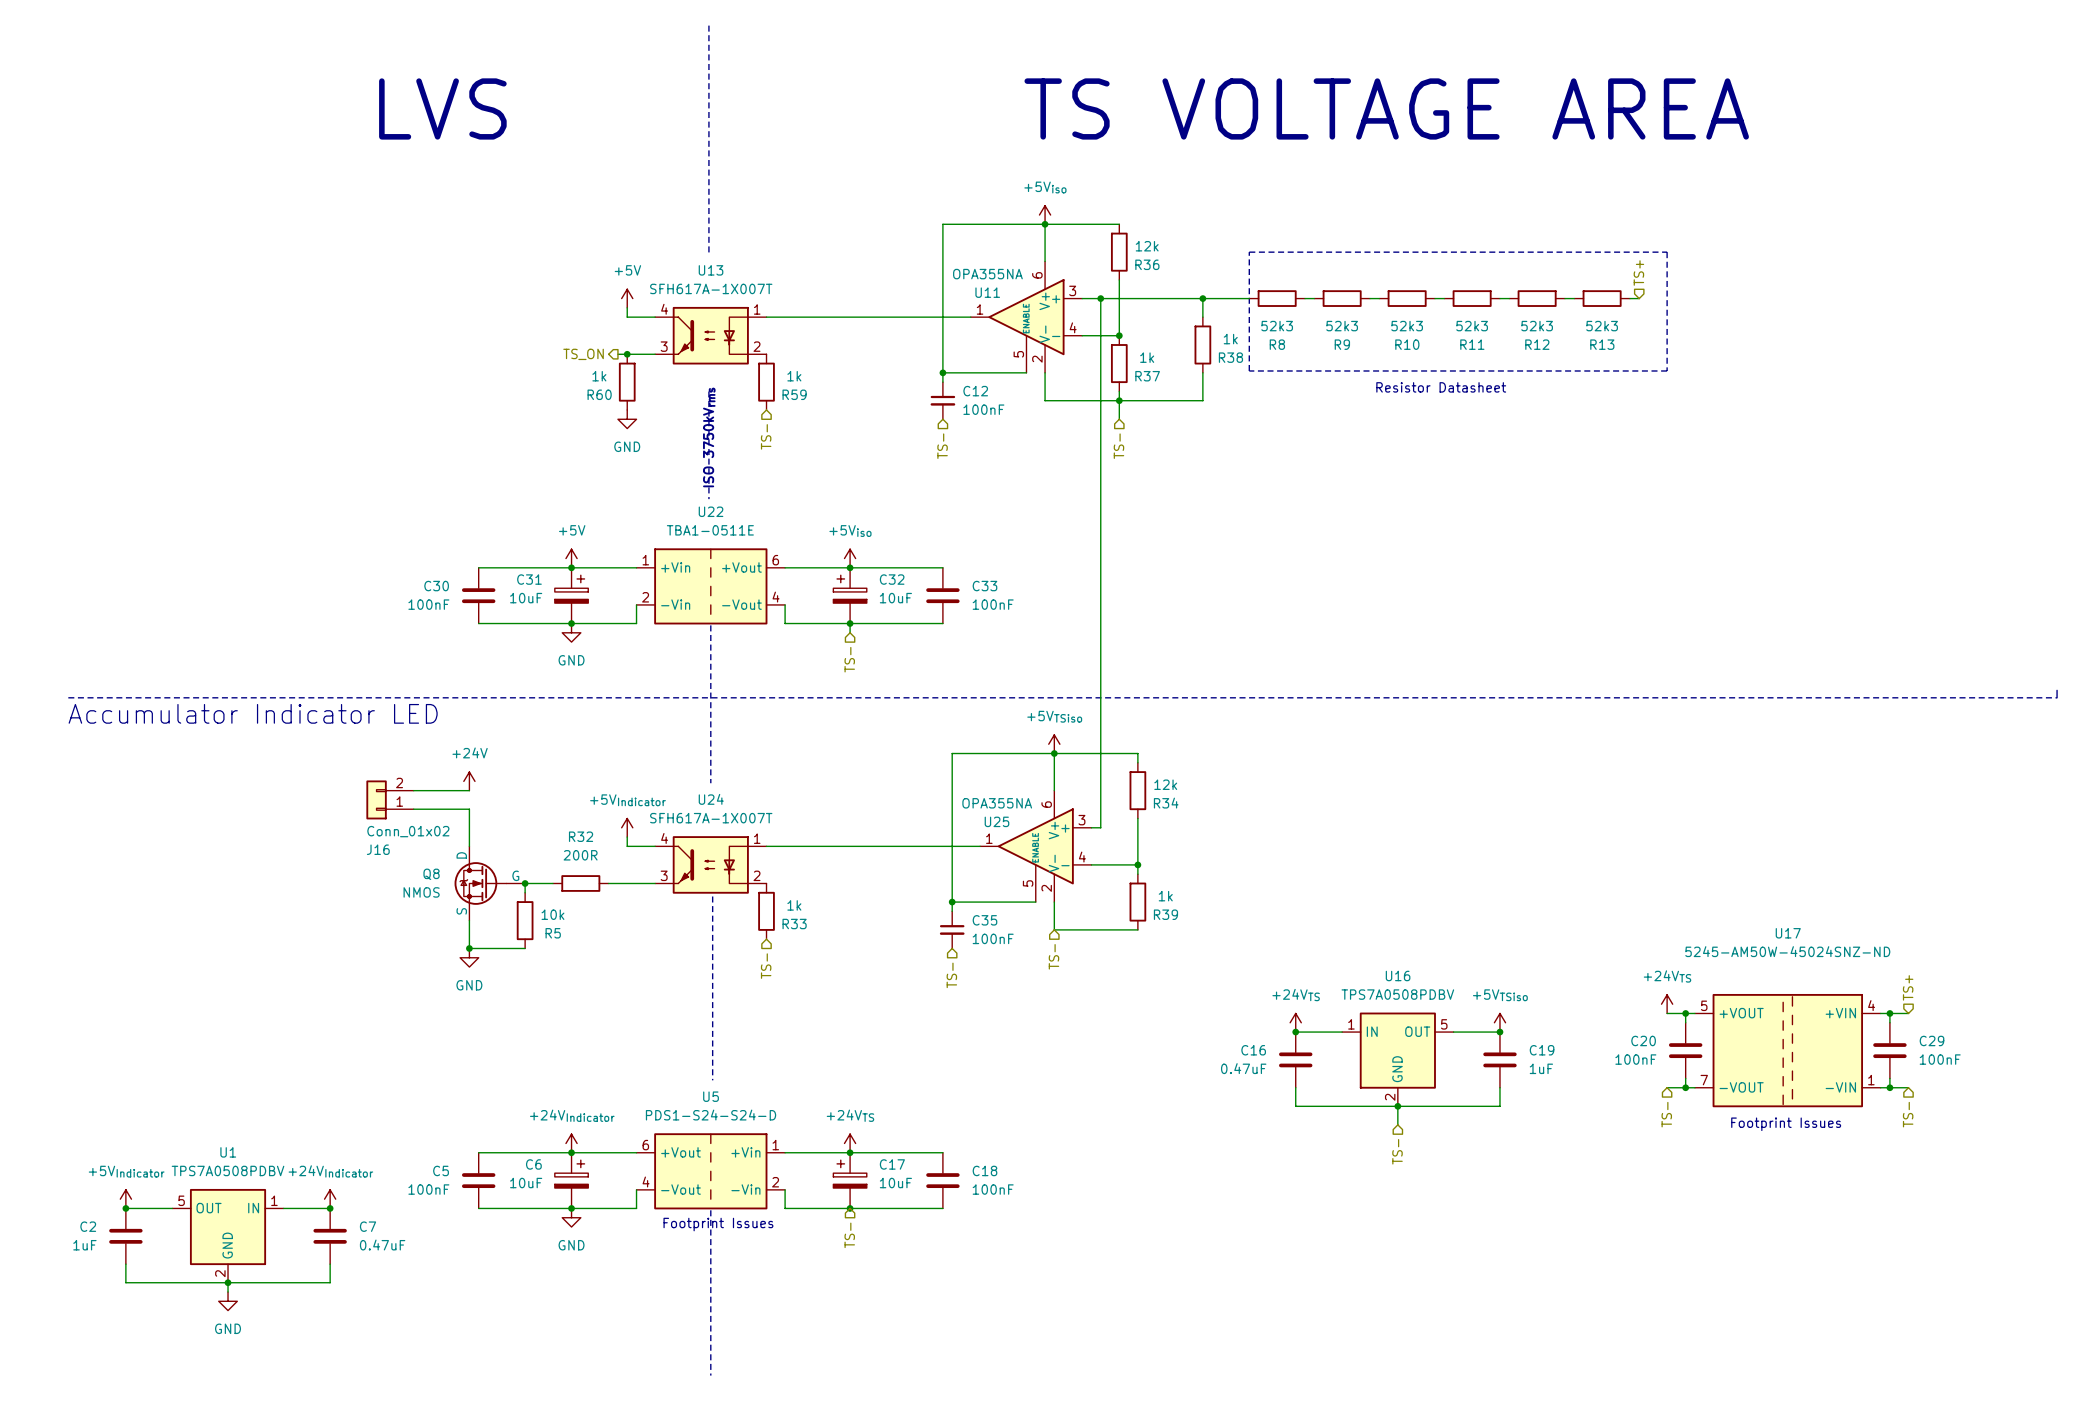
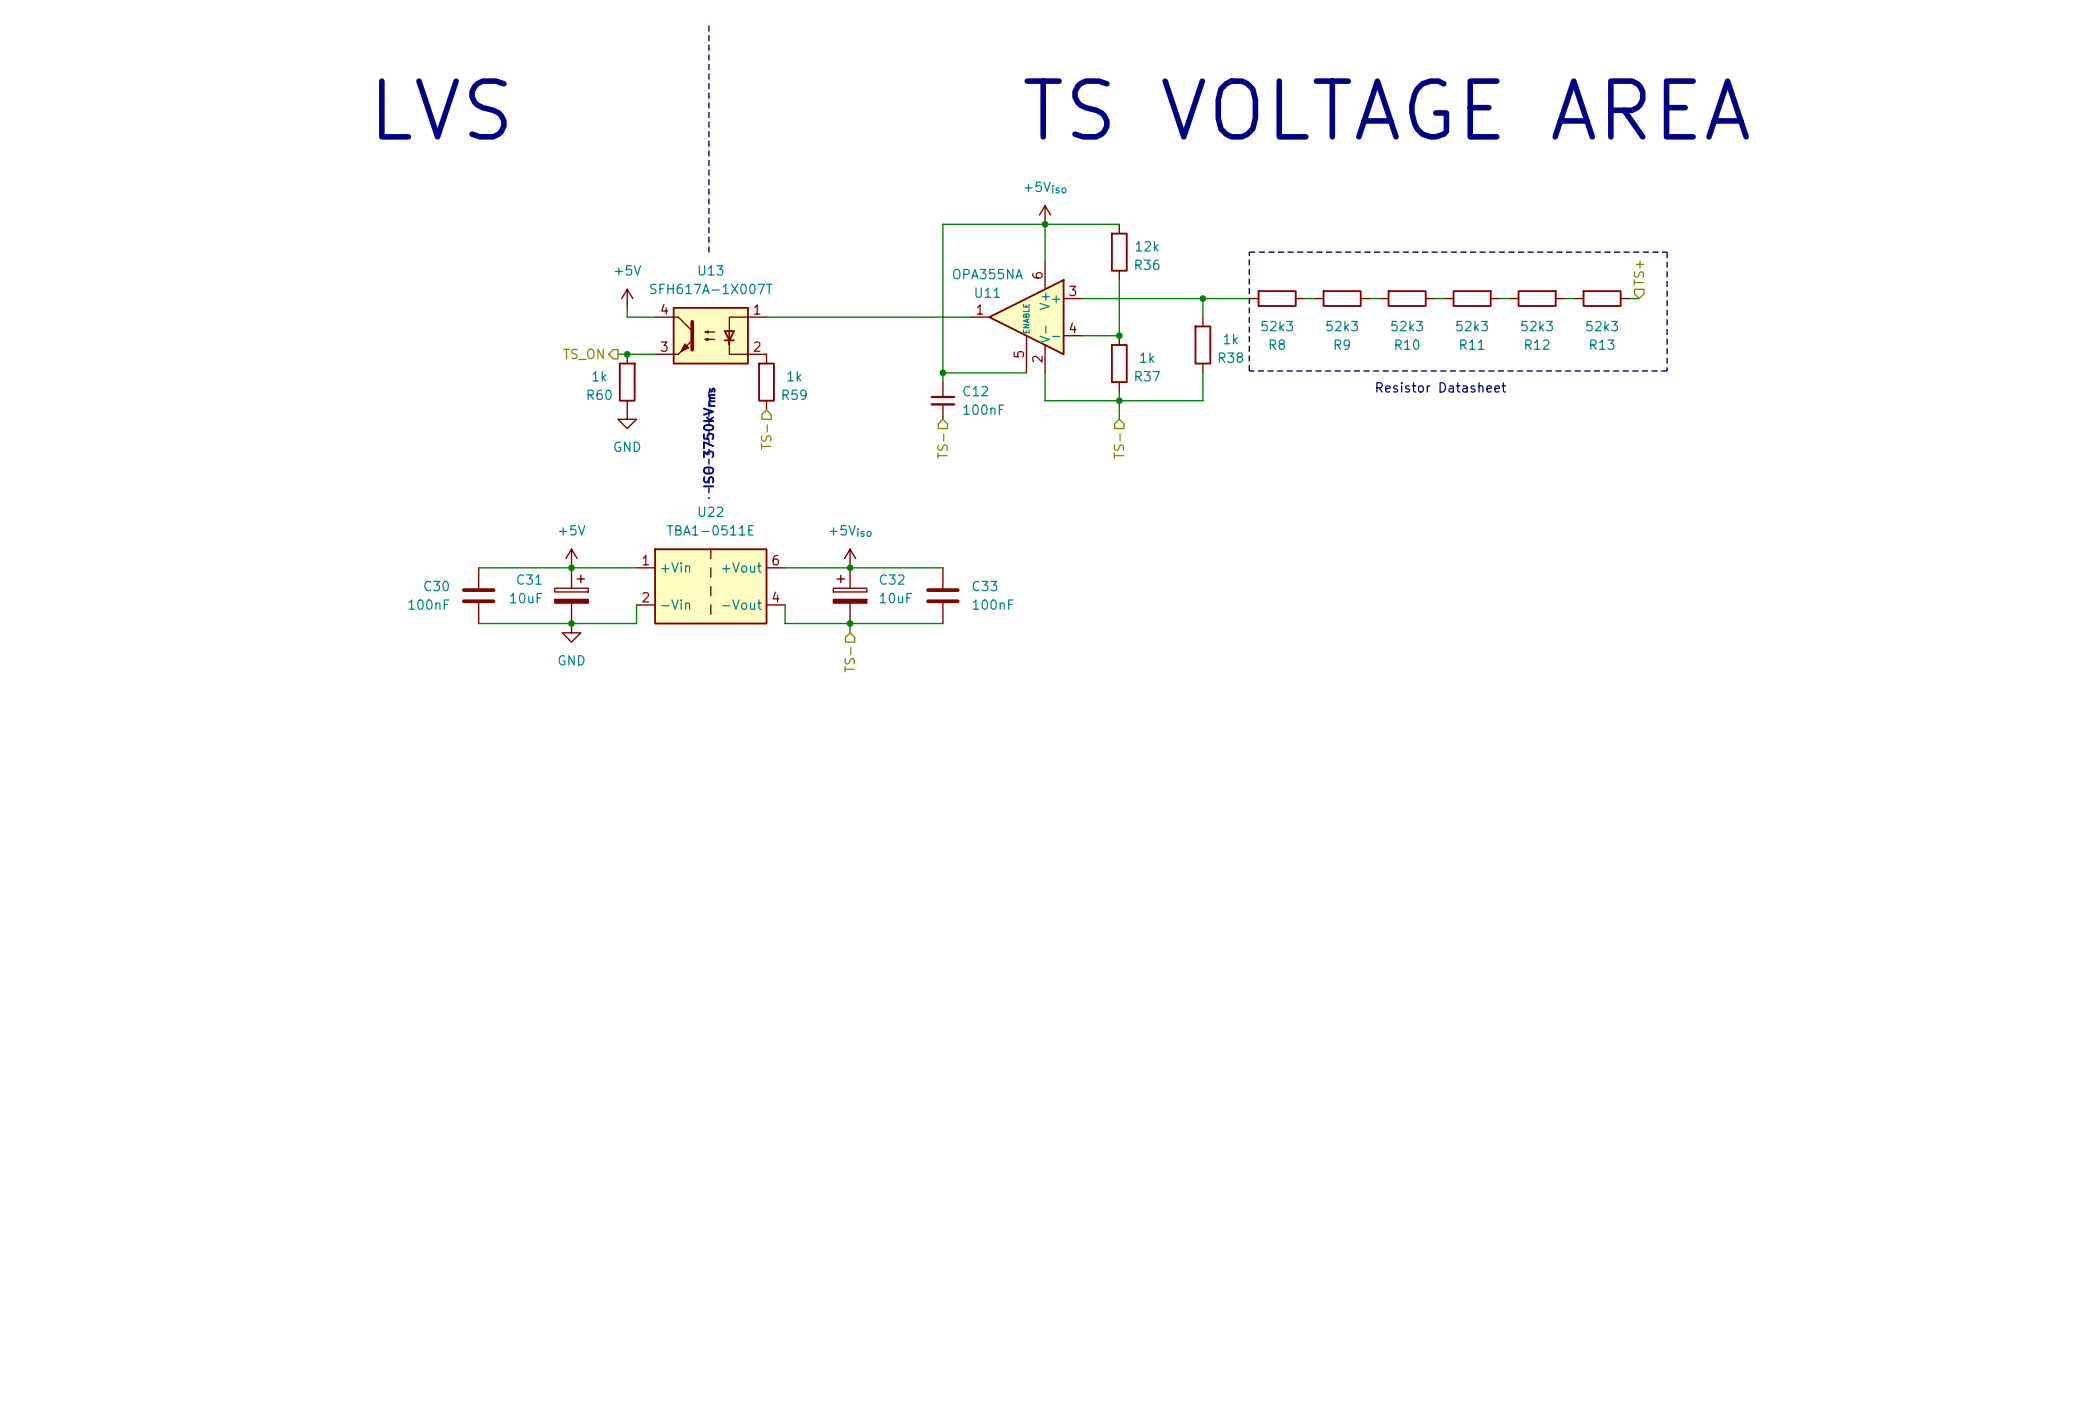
wire: (1100, 298) (1100, 827) (1091, 827) -> none
junction: (1100, 298) -> none
line: (710, 625) (710, 783) -> none
line: (2057, 690) (2057, 697) (68, 697) -> none
text: Accumulator Indicator LED (253, 713) -> none
power symbol: +5VTSiso (1054, 744) -> none
wire: (1054, 753) (1054, 790) -> none
junction: (1054, 753) -> none
wire: (1137, 762) (1137, 753) (952, 753) (952, 911) -> none
power symbol: +24V (469, 781) -> none
wire: (413, 790) (469, 790) -> none
R34: 12k (1137, 790) -> none
J16: Conn_01x02 (390, 799) -> none
wire: (413, 809) (469, 809) (469, 846) -> none
wire: (1137, 818) (1137, 874) -> none
power symbol: +5VIndicator (627, 827) -> none
wire: (627, 837) (627, 846) (655, 846) -> none
wire: (766, 846) (980, 846) -> none
U25: OPA355NA (1035, 846) -> none
U24: SFH617A-1X007T (710, 864) -> none
wire: (1091, 864) (1137, 864) -> none
junction: (1137, 864) -> none
Q8: NMOS (489, 883) -> none
junction: (525, 883) -> none
wire: (552, 883) (525, 883) (525, 892) -> none
R32: 200R (580, 883) -> none
wire: (608, 883) (655, 883) -> none
line: (712, 896) (712, 1080) -> none
wire: (952, 902) (1035, 902) -> none
junction: (952, 902) -> none
wire: (1054, 902) (1054, 929) (1137, 929) -> none
R39: 1k (1137, 902) -> none
R33: 1k (766, 911) -> none
wire: (469, 920) (469, 948) (525, 948) -> none
R5: 10k (525, 920) -> none
C35: 100nF (952, 929) -> none
junction: (469, 948) -> none
hierarchical label: TS- (1053, 956) -> none
power symbol: GND (469, 957) -> none
hierarchical label: TS- (766, 966) -> none
hierarchical label: TS- (951, 975) -> none
hierarchical label: TS+ (1908, 987) -> none
power symbol: +24VTS (1667, 1004) -> none
wire: (1667, 1013) (1694, 1013) -> none
wire: (1685, 1013) (1685, 1022) -> none
junction: (1685, 1013) -> none
wire: (1880, 1013) (1908, 1013) -> none
wire: (1889, 1013) (1889, 1022) -> none
junction: (1889, 1013) -> none
power symbol: +24VTS (1295, 1022) -> none
power symbol: +5VTSiso (1499, 1022) -> none
wire: (1295, 1032) (1342, 1032) -> none
junction: (1295, 1032) -> none
wire: (1453, 1032) (1499, 1032) -> none
junction: (1499, 1032) -> none
C20: 100nF (1685, 1050) -> none
U17: 5245-AM50W-45024SNZ-ND (1787, 1050) -> none
C29: 100nF (1889, 1050) -> none
C16: 0.47uF (1295, 1059) -> none
U16: TPS7A0508PDBV (1397, 1059) -> none
C19: 1uF (1499, 1059) -> none
wire: (1685, 1078) (1685, 1087) -> none
wire: (1889, 1078) (1889, 1087) -> none
wire: (1295, 1087) (1295, 1106) (1499, 1106) (1499, 1087) -> none
wire: (1667, 1087) (1694, 1087) -> none
junction: (1685, 1087) -> none
wire: (1880, 1087) (1908, 1087) -> none
junction: (1889, 1087) -> none
wire: (1397, 1106) (1397, 1124) -> none
junction: (1397, 1106) -> none
hierarchical label: TS- (1666, 1114) -> none
hierarchical label: TS- (1908, 1114) -> none
text: Footprint Issues (1786, 1124) -> none
power symbol: +24VIndicator (571, 1143) -> none
power symbol: +24VTS (850, 1143) -> none
hierarchical label: TS- (1397, 1151) -> none
wire: (478, 1152) (636, 1152) -> none
junction: (571, 1152) -> none
wire: (785, 1152) (942, 1152) -> none
junction: (850, 1152) -> none
U5: PDS1-S24-S24-D (710, 1171) -> none
C5: 100nF (478, 1180) -> none
C6: 10uF (571, 1180) -> none
C17: 10uF (850, 1180) -> none
C18: 100nF (942, 1180) -> none
wire: (636, 1189) (636, 1208) (478, 1208) -> none
wire: (785, 1189) (785, 1208) (942, 1208) -> none
power symbol: +5VIndicator (125, 1199) -> none
power symbol: +24VIndicator (330, 1199) -> none
wire: (125, 1208) (172, 1208) -> none
junction: (125, 1208) -> none
wire: (283, 1208) (330, 1208) -> none
junction: (330, 1208) -> none
junction: (571, 1208) -> none
junction: (850, 1208) -> none
line: (710, 1210) (710, 1375) -> none
power symbol: GND (571, 1217) -> none
text: Footprint Issues (718, 1224) -> none
U1: TPS7A0508PDBV (228, 1235) -> none
hierarchical label: TS- (849, 1235) -> none
C2: 1uF (125, 1236) -> none
C7: 0.47uF (330, 1236) -> none
wire: (125, 1264) (125, 1282) (330, 1282) (330, 1264) -> none
wire: (228, 1282) (228, 1292) -> none
junction: (228, 1282) -> none
power symbol: GND (228, 1301) -> none

